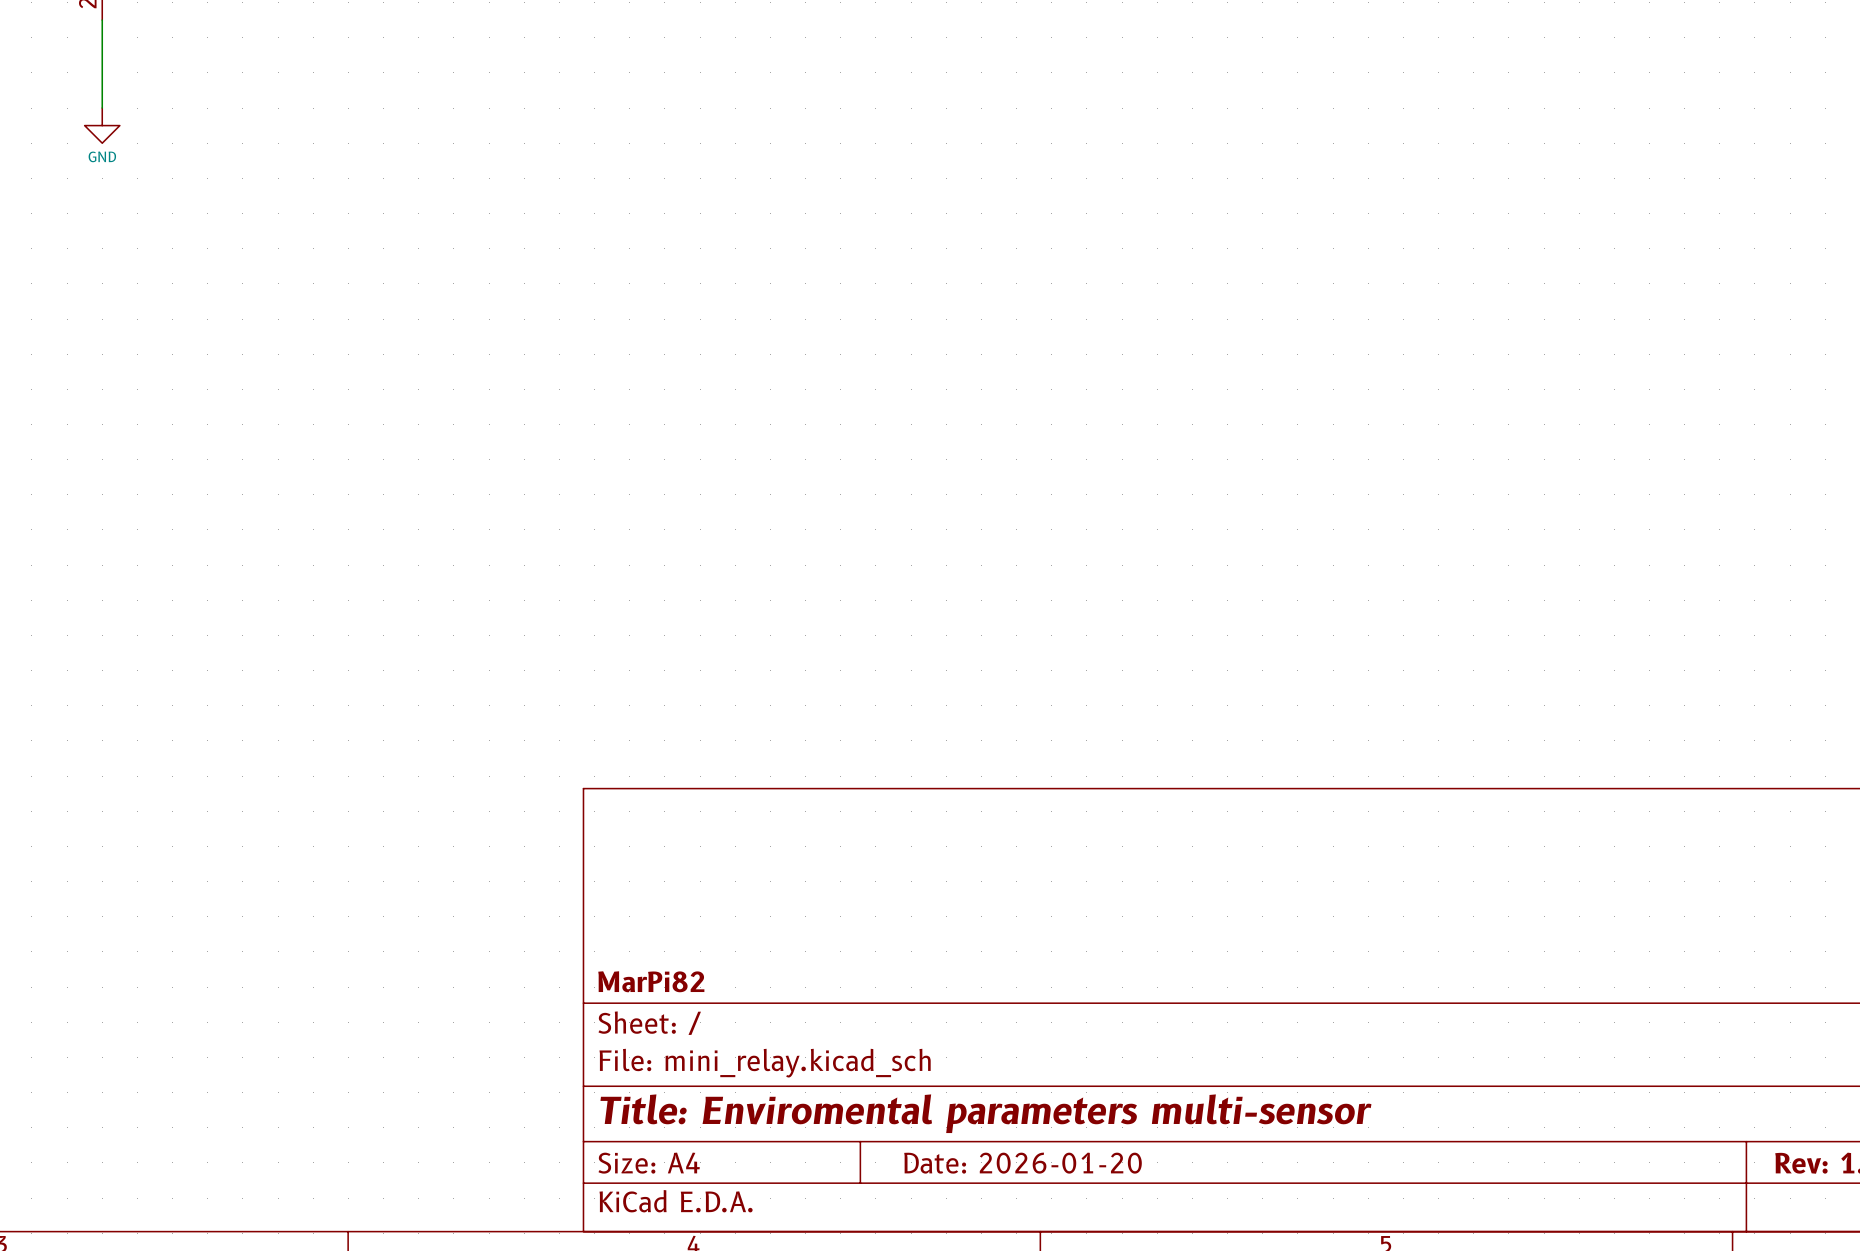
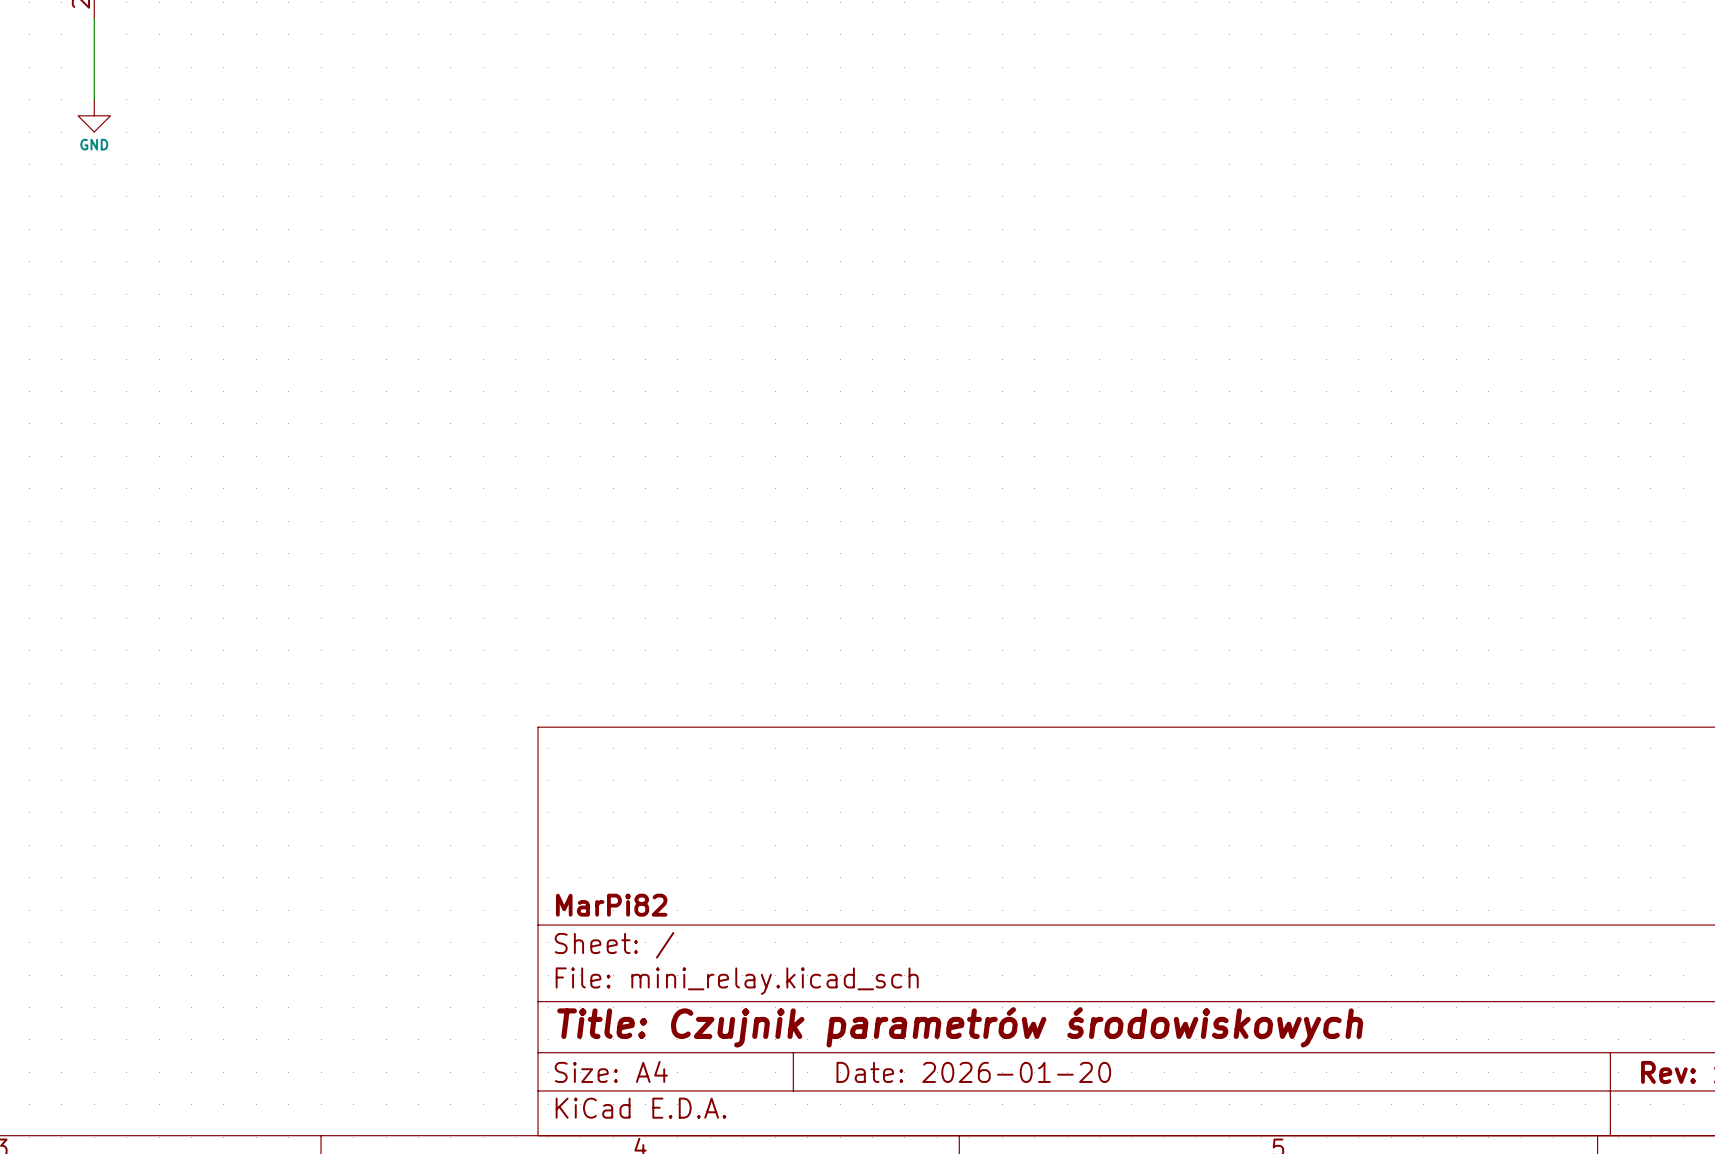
title block: Title: Enviromental parameters multi-sensor (985, 1113) -> Title: Czujnik parametrów środowiskowych (960, 1027)

